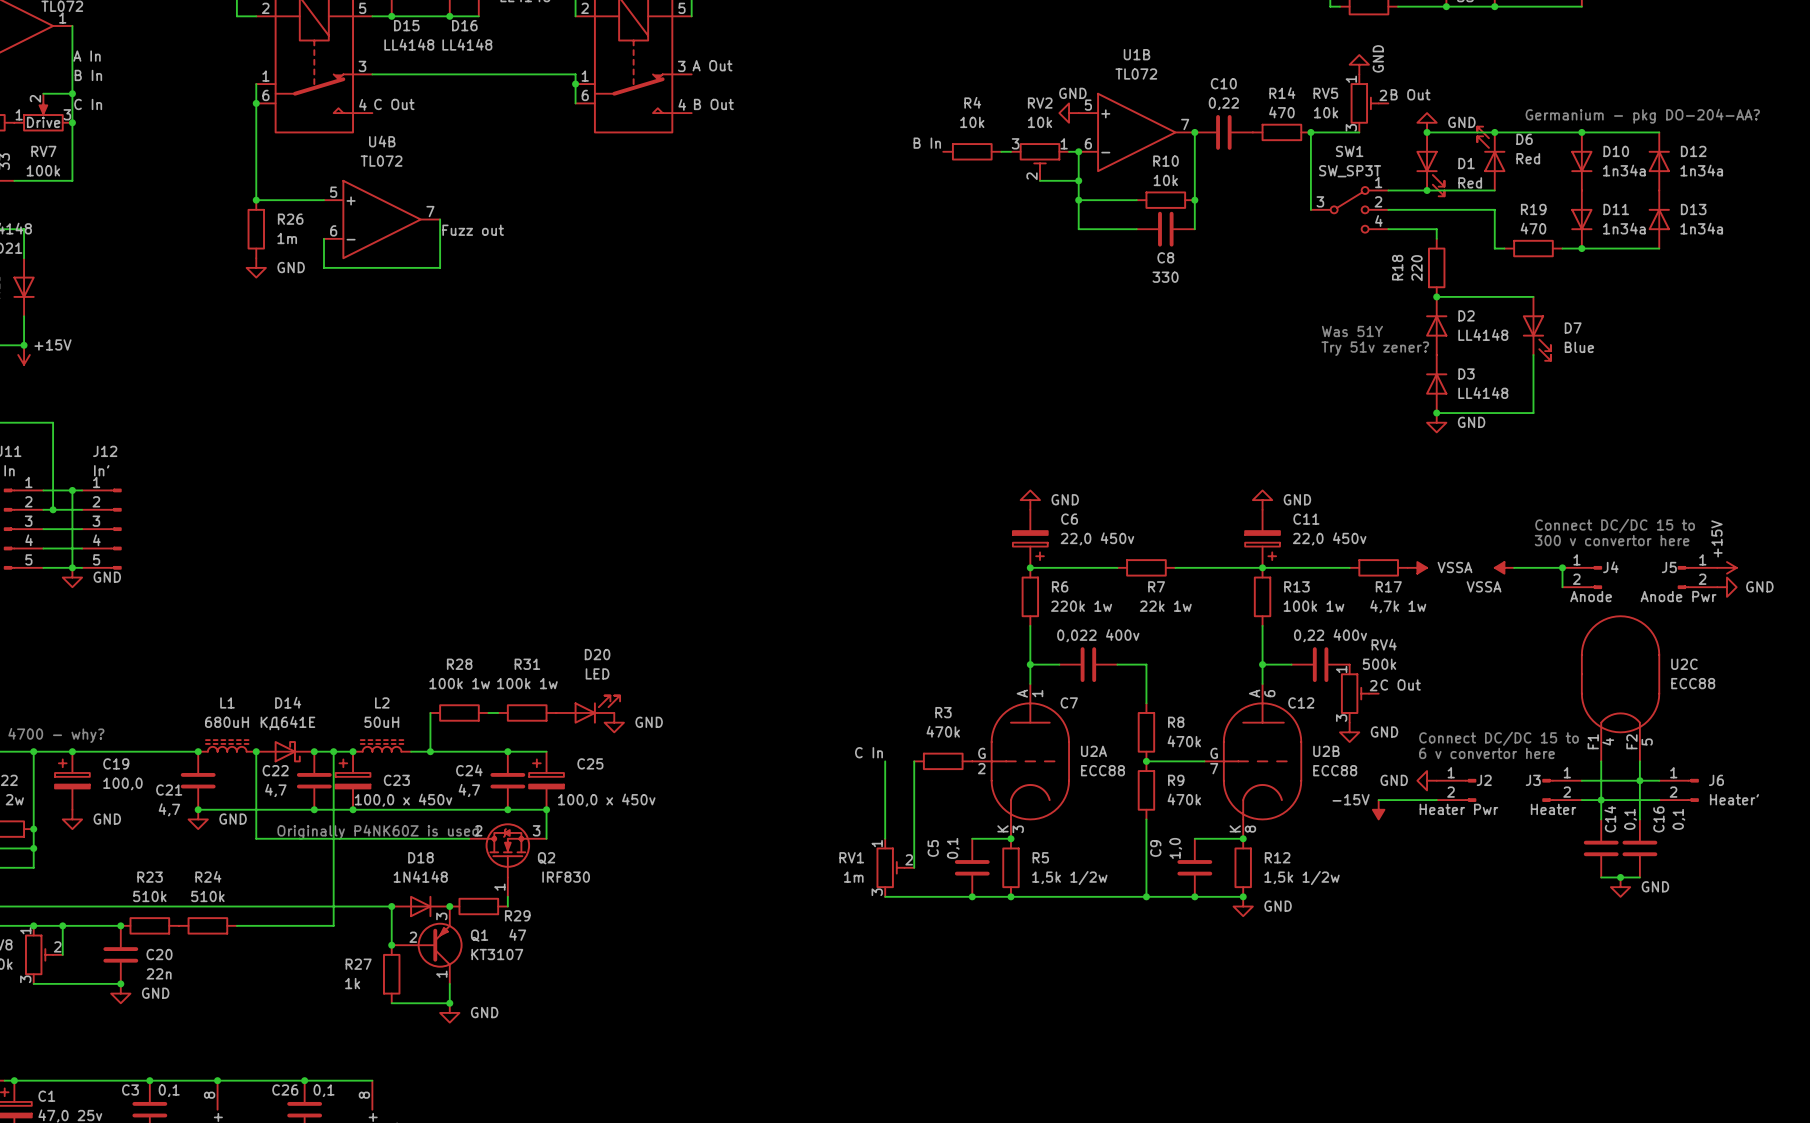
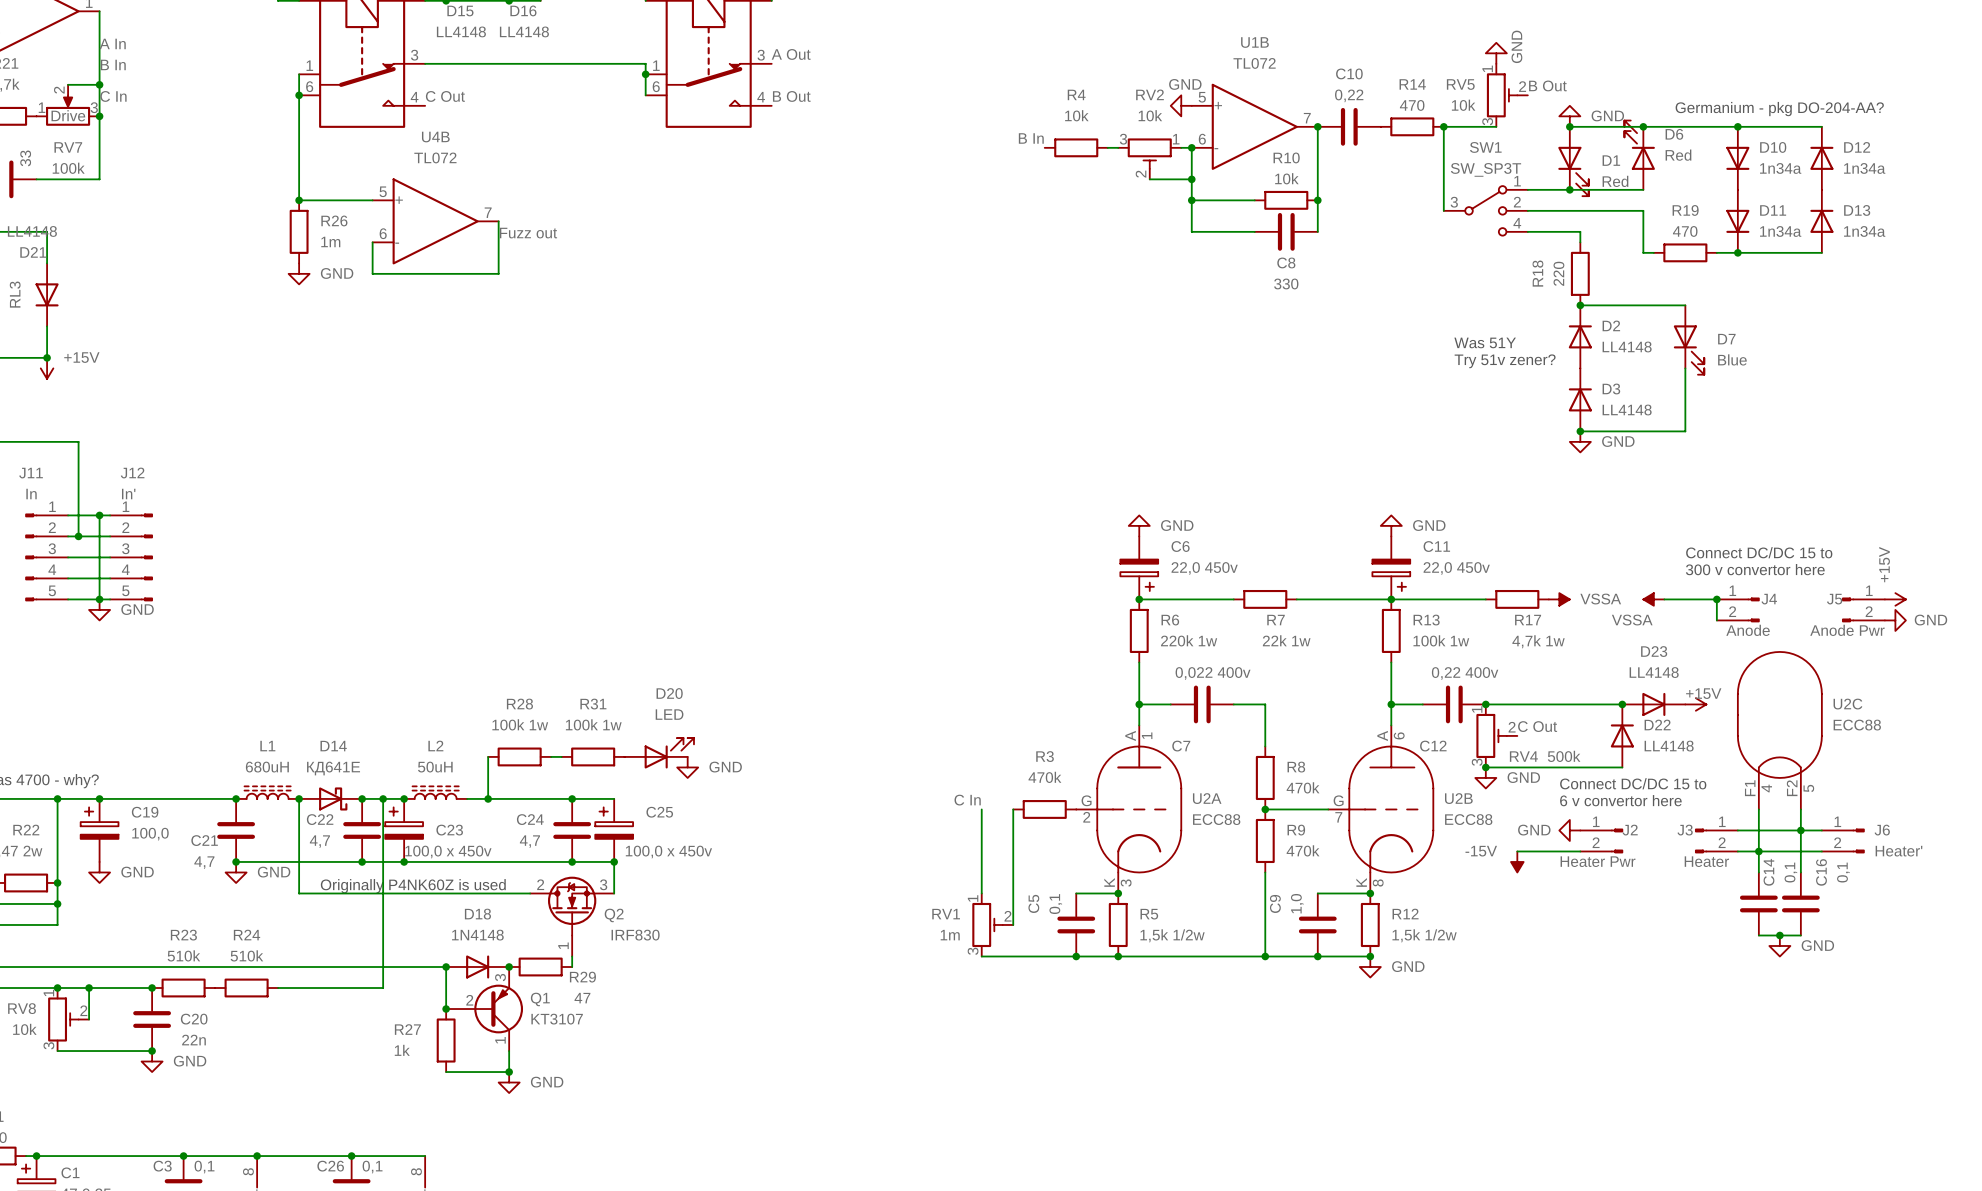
RV4 name position: RV4 (1384, 644) -> RV4 (1523, 756)
wire: none -> (1485, 704) (1622, 704)
junction: none -> (1485, 704)
RV4 value position: 500k (1379, 664) -> 500k (1564, 756)
junction: none -> (1622, 704)
D23: none -> LL4148 (1653, 704)
power symbol: none -> +15V (1695, 704)
D22: none -> LL4148 (1622, 735)
wire: none -> (1485, 767) (1622, 767)
junction: none -> (1485, 767)

